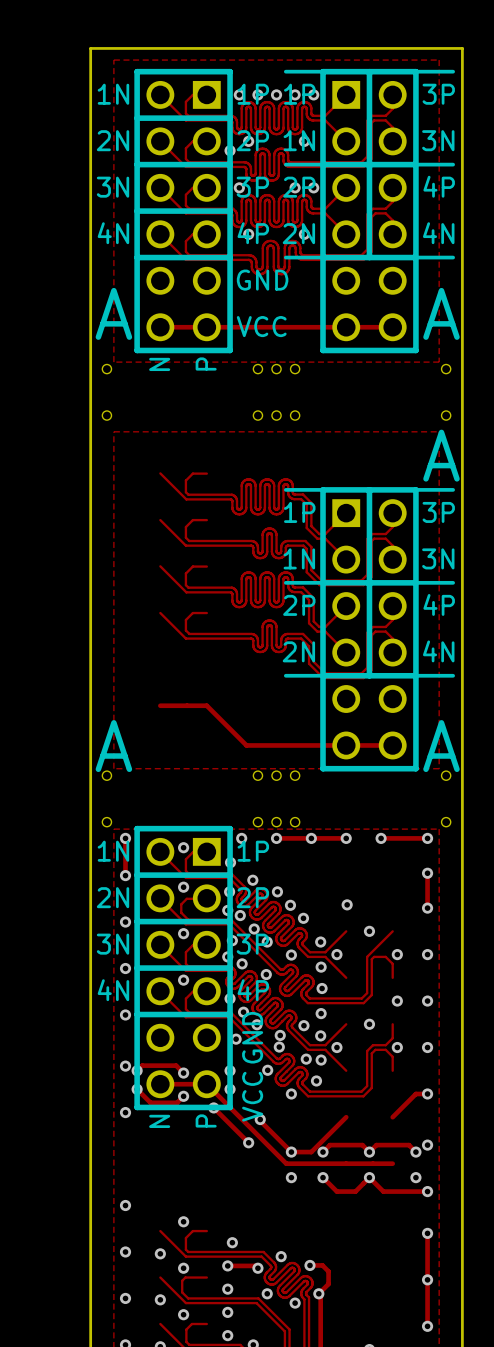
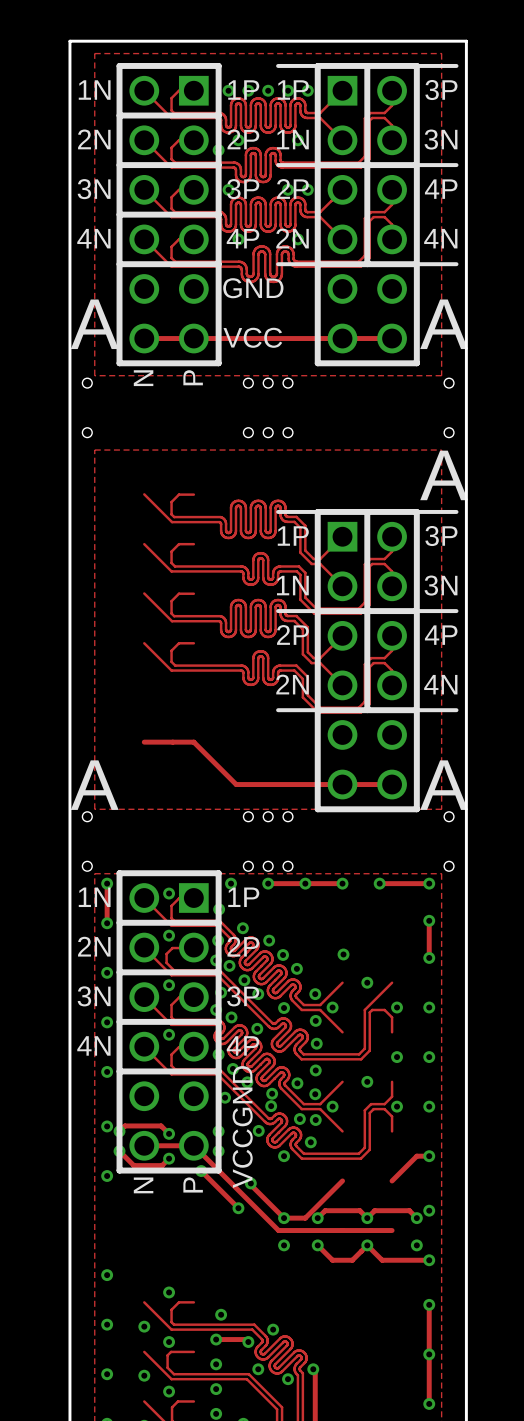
track: (309, 1265) (322, 1265) (328, 1271) (328, 1284) (318, 1293) -> none
via: (309, 1265) -> none

